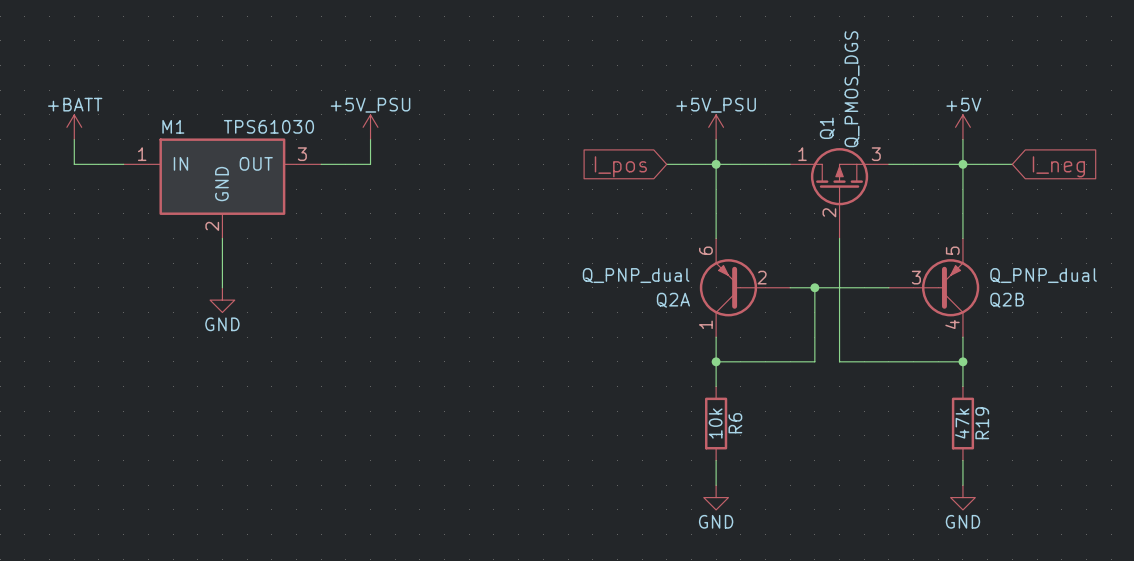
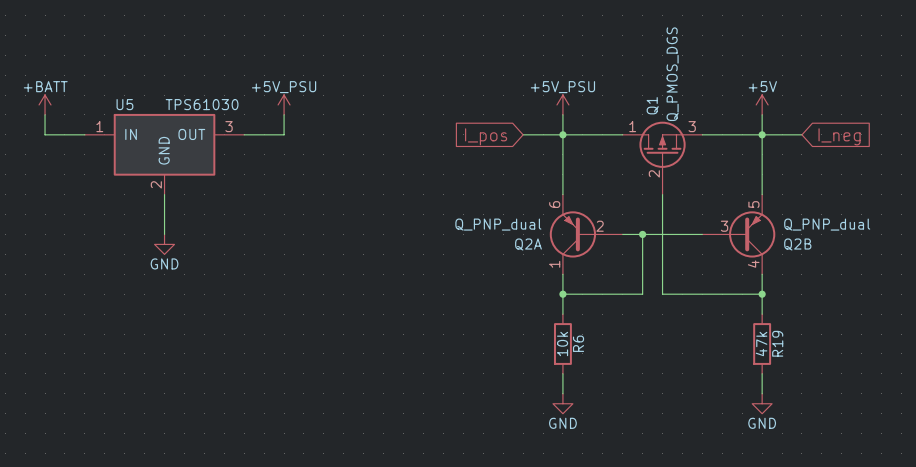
M1 name: M1 (173, 126) -> U5 (124, 104)

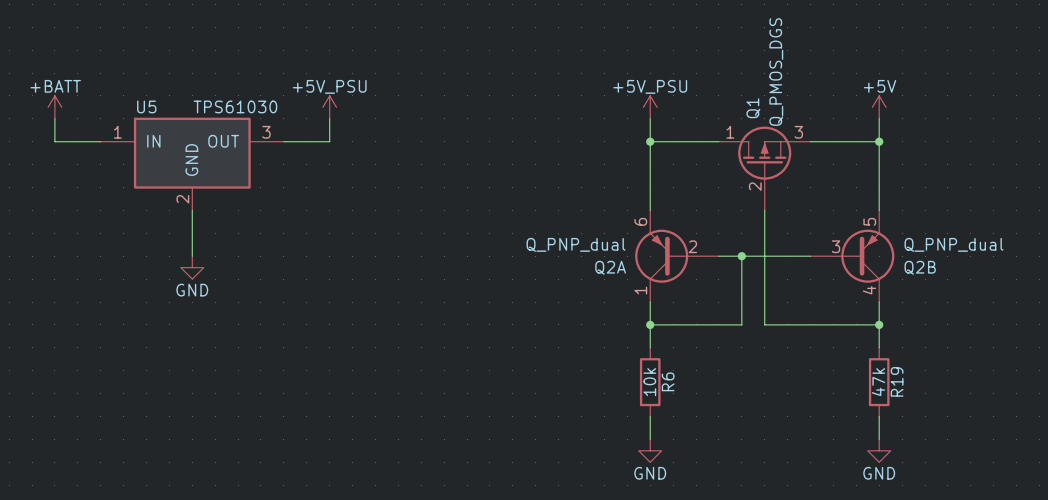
wire: (523, 134) (562, 134) -> none
wire: (762, 134) (801, 134) -> none
global label: I_pos (486, 136) -> none
global label: I_neg (839, 136) -> none

